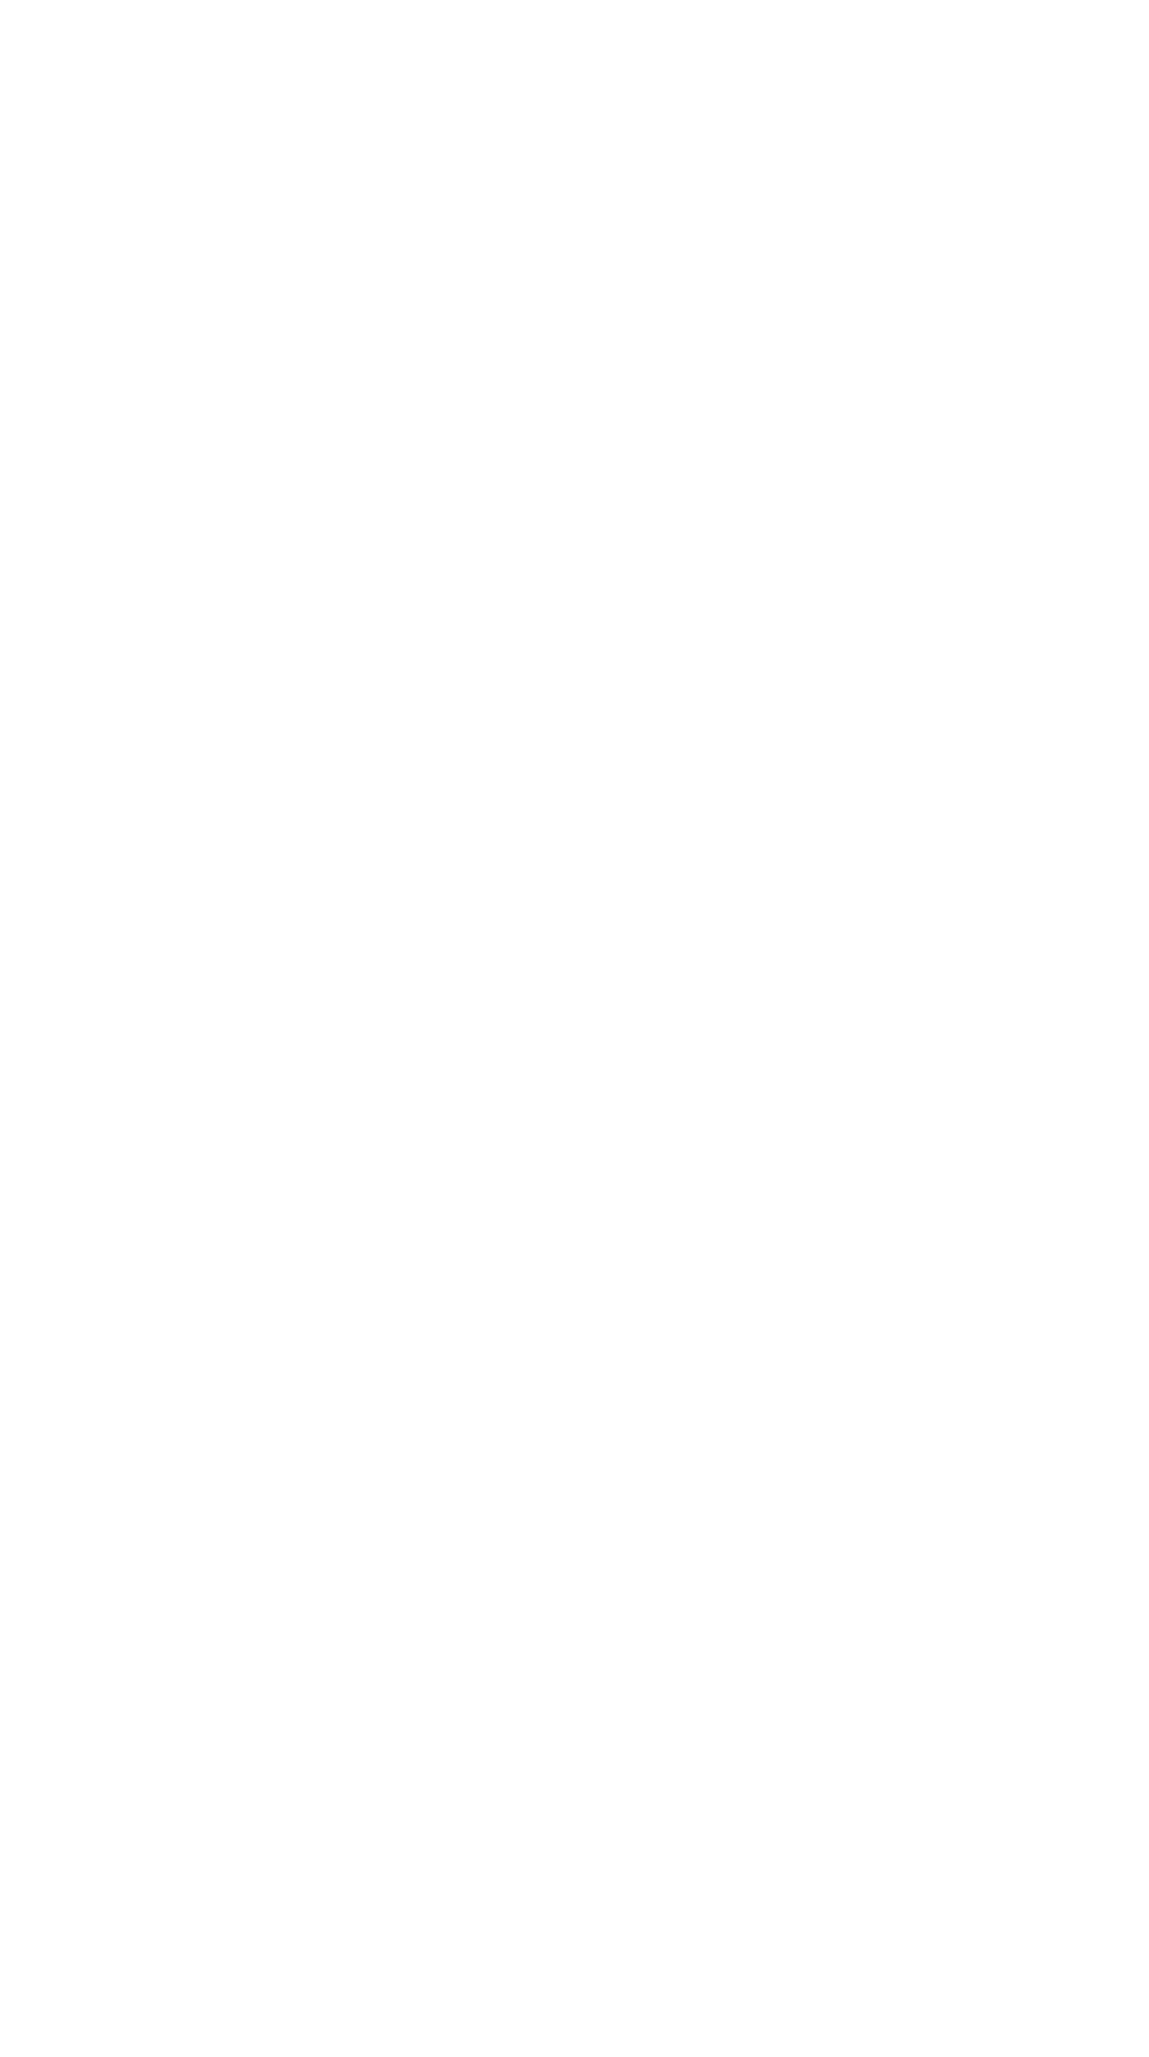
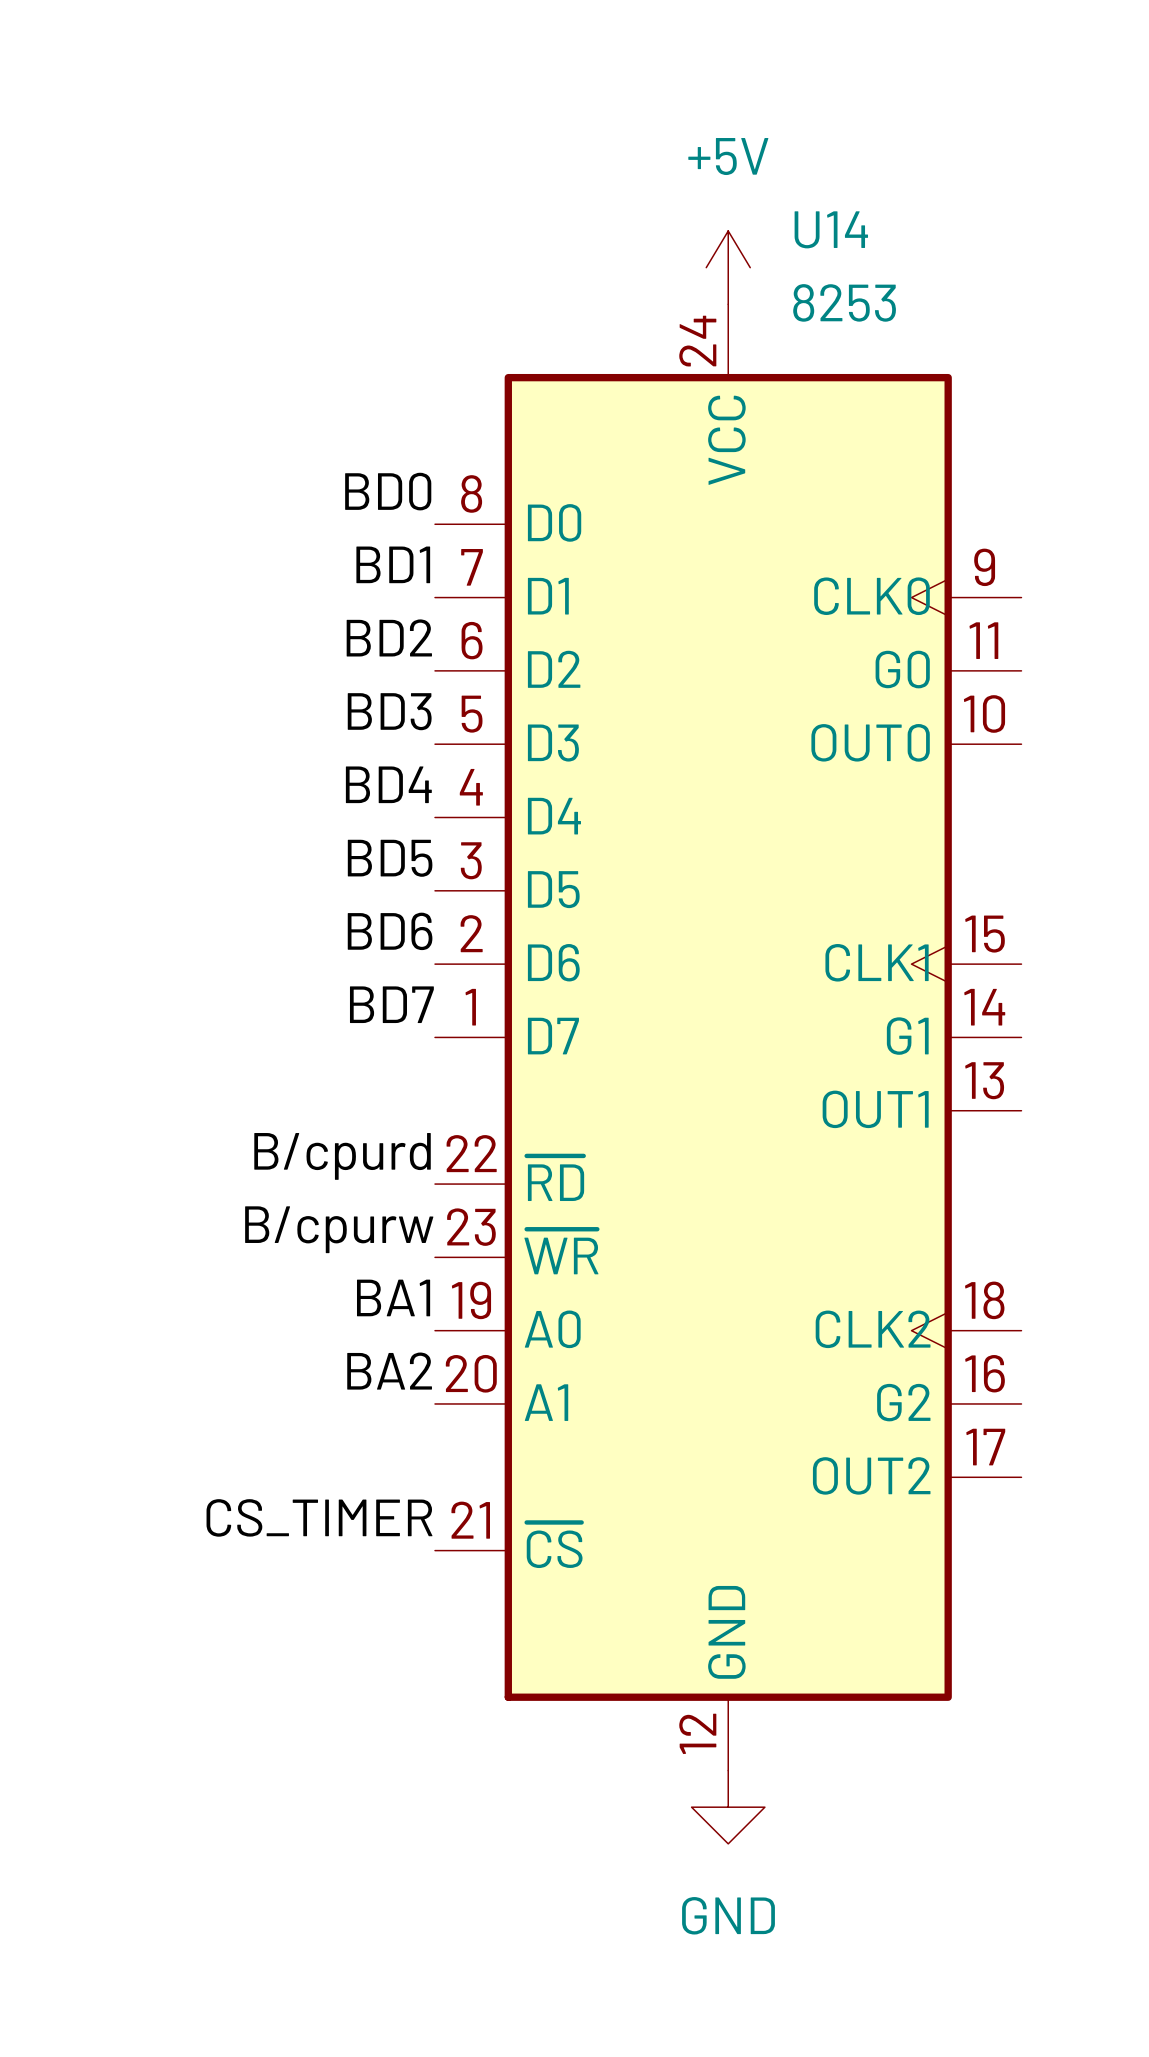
power symbol: none -> +5V (728, 267)
label: none -> BD0 (388, 491)
label: none -> BD1 (393, 564)
label: none -> BD2 (389, 637)
label: none -> BD3 (389, 711)
label: none -> BD4 (388, 784)
label: none -> BD5 (390, 858)
label: none -> BD6 (390, 931)
label: none -> BD7 (391, 1004)
U14: none -> 8253 (728, 1037)
label: none -> B/cpurd (342, 1156)
label: none -> B/cpurw (339, 1229)
label: none -> BA1 (393, 1297)
label: none -> BA2 (389, 1371)
label: none -> CS_TIMER (319, 1517)
power symbol: none -> GND (728, 1807)

